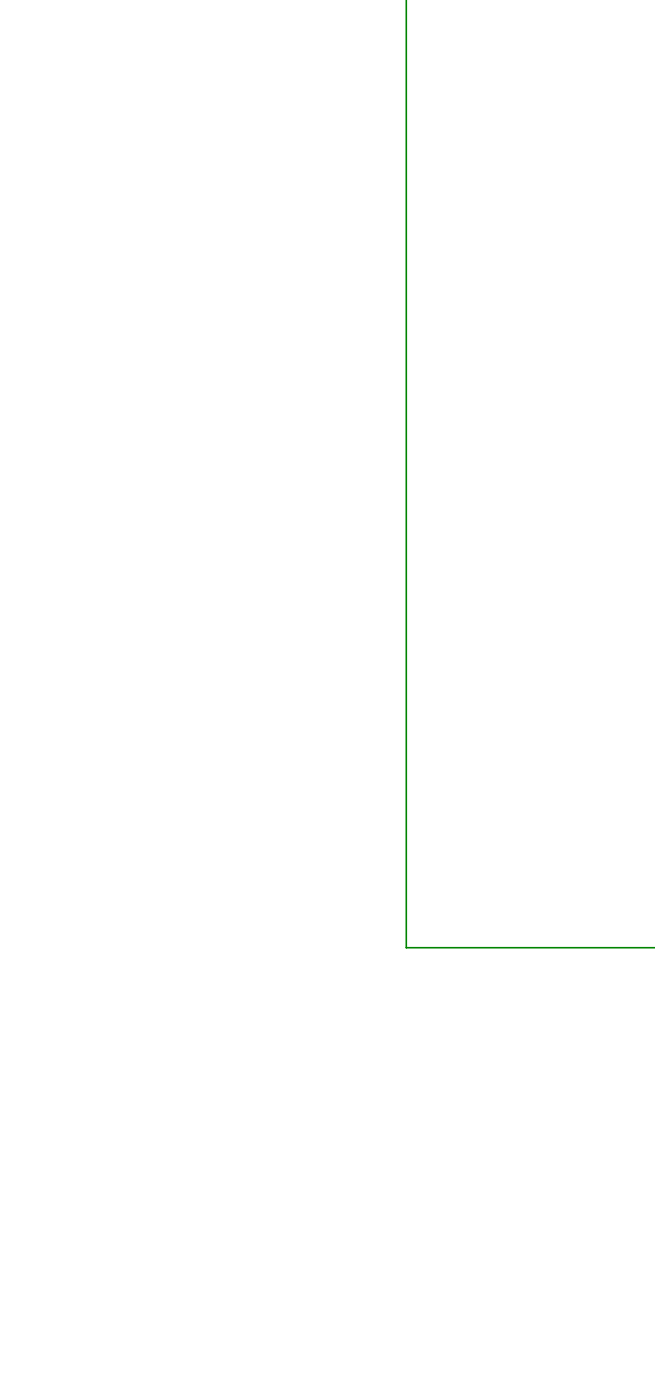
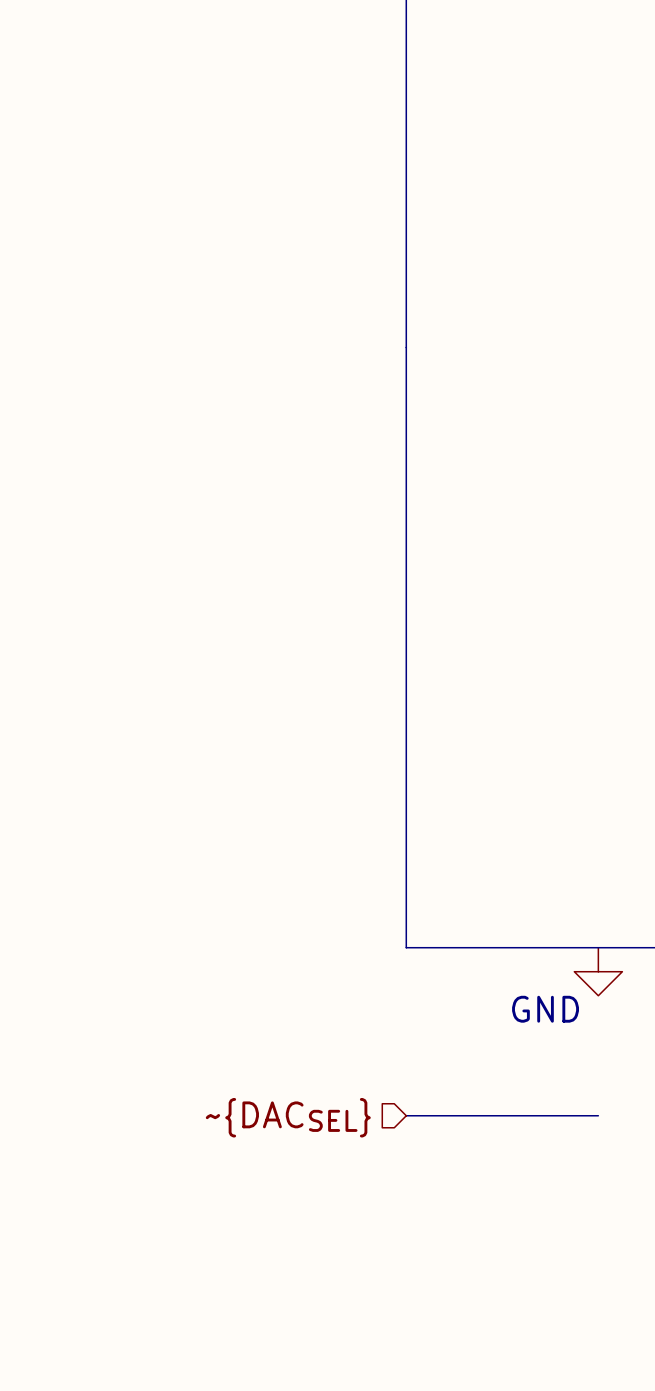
power symbol: none -> GND (598, 971)
wire: none -> (406, 1115) (598, 1115)
hierarchical label: none -> ~{DACSEL} (288, 1117)

